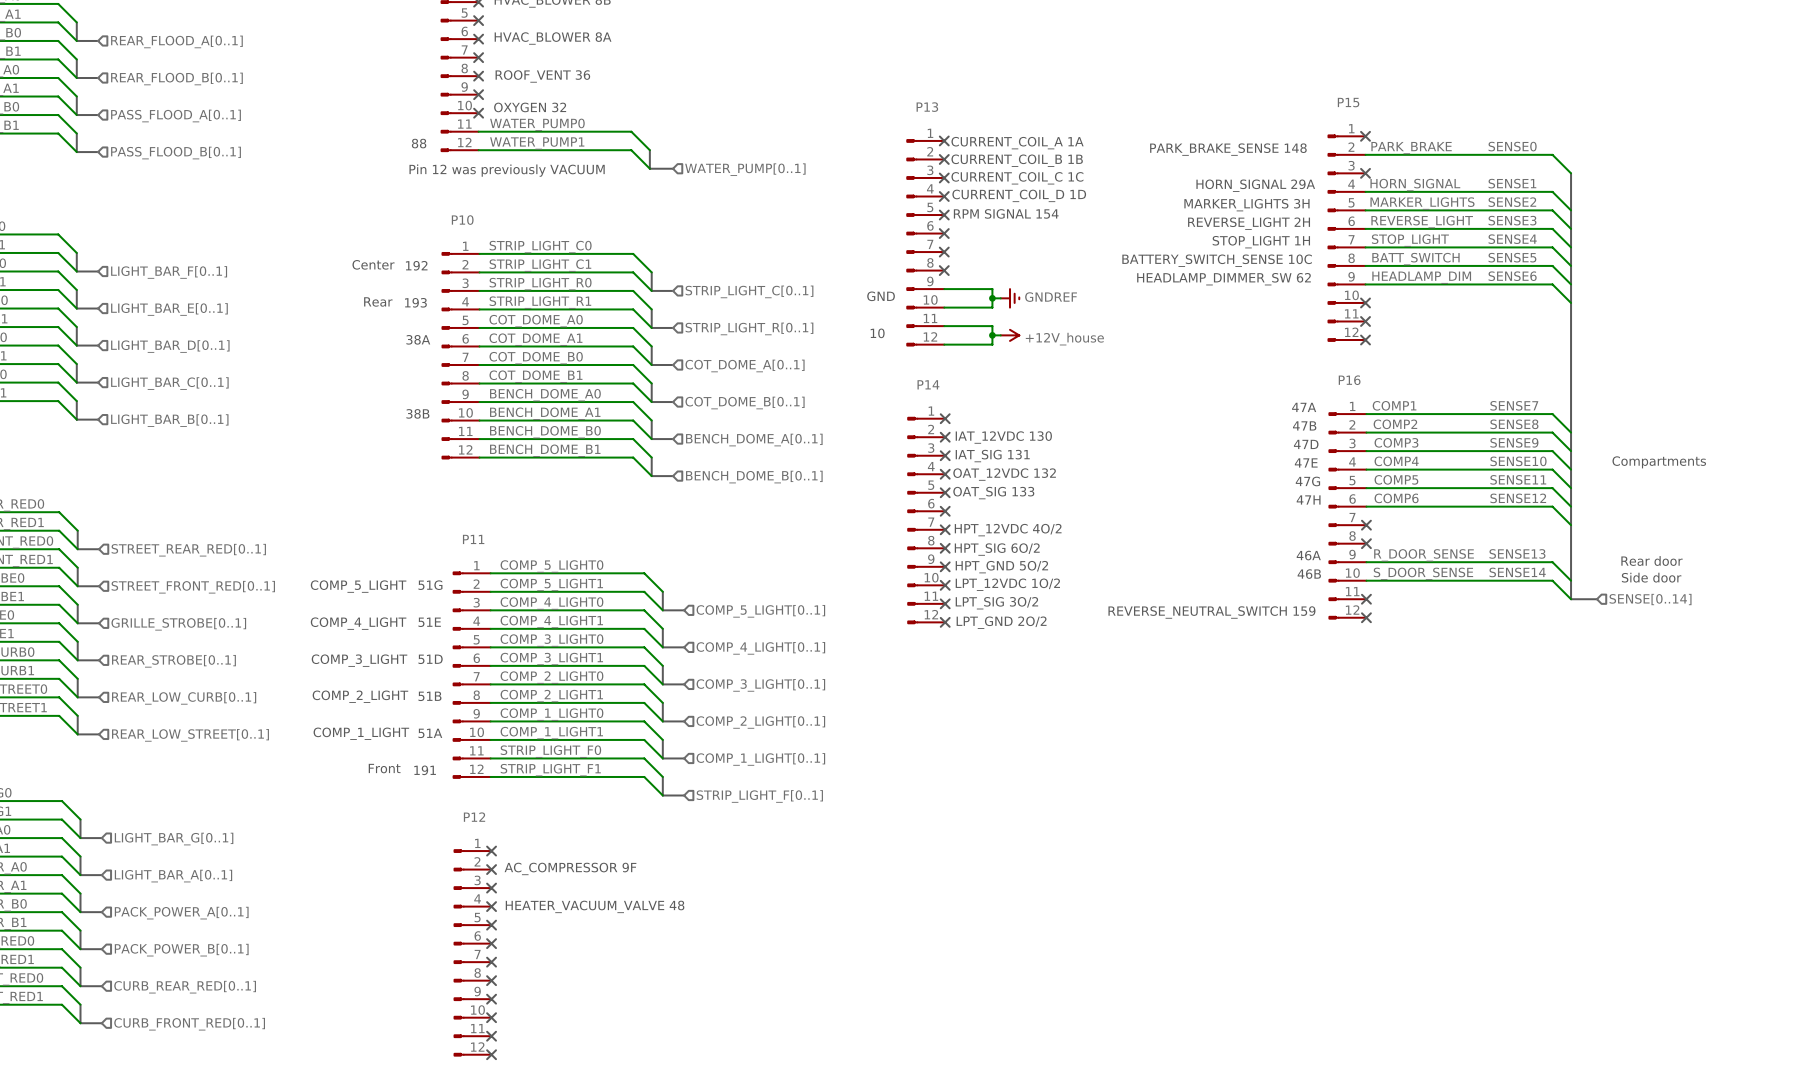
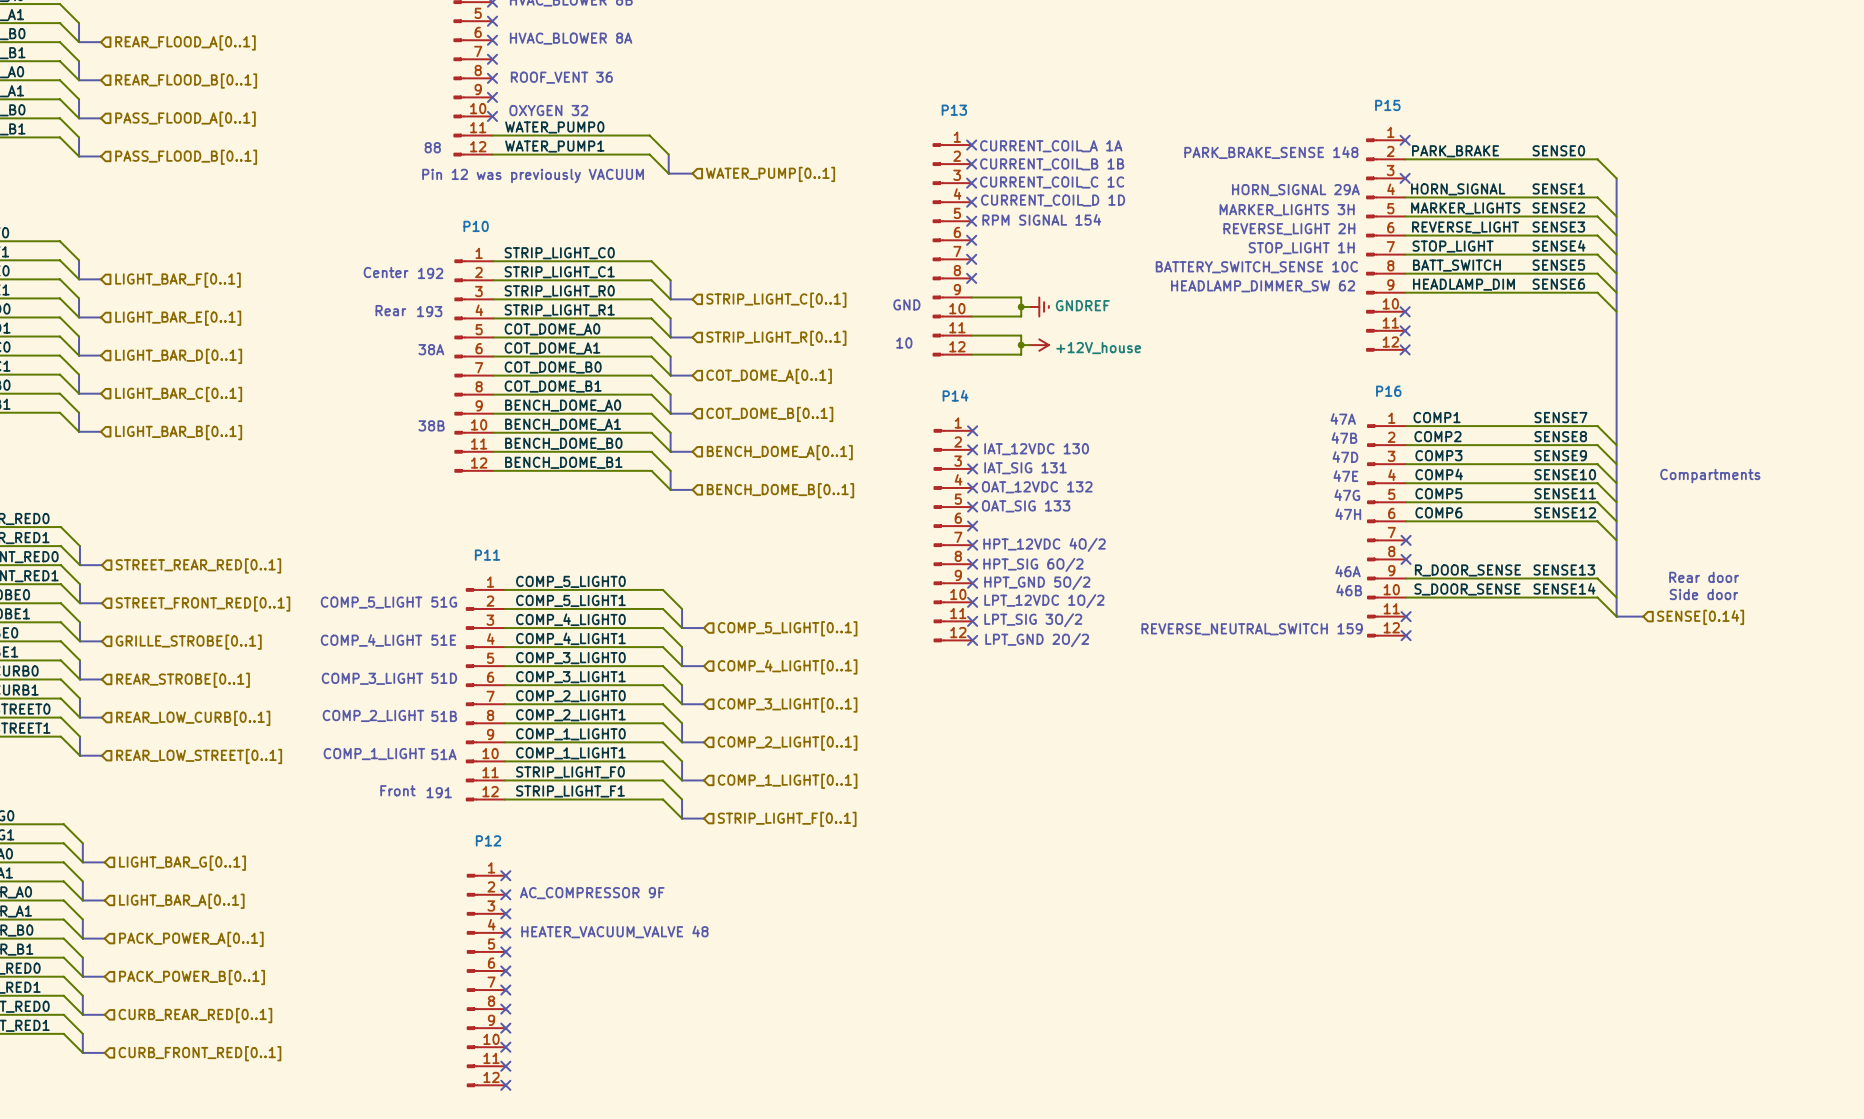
hierarchical label: SENSE[0..14] (1650, 599) -> SENSE[0.14] (1700, 617)

